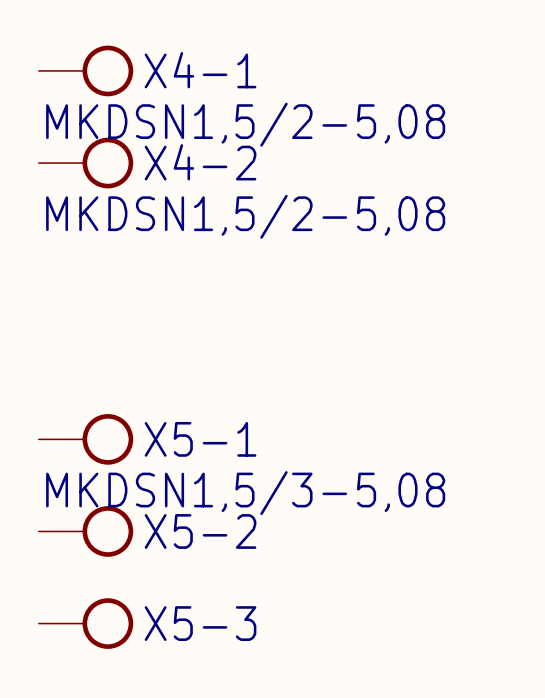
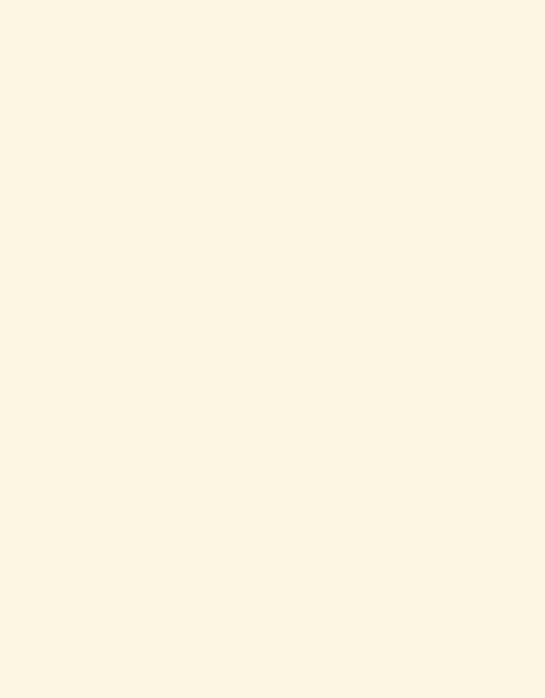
X4-1: MKDSN1,5/2-5,08 (86, 70) -> none
X4-2: MKDSN1,5/2-5,08 (86, 163) -> none
X5-1: MKDSN1,5/3-5,08 (86, 439) -> none
X5-2: (86, 531) -> none
X5-3: (86, 623) -> none

